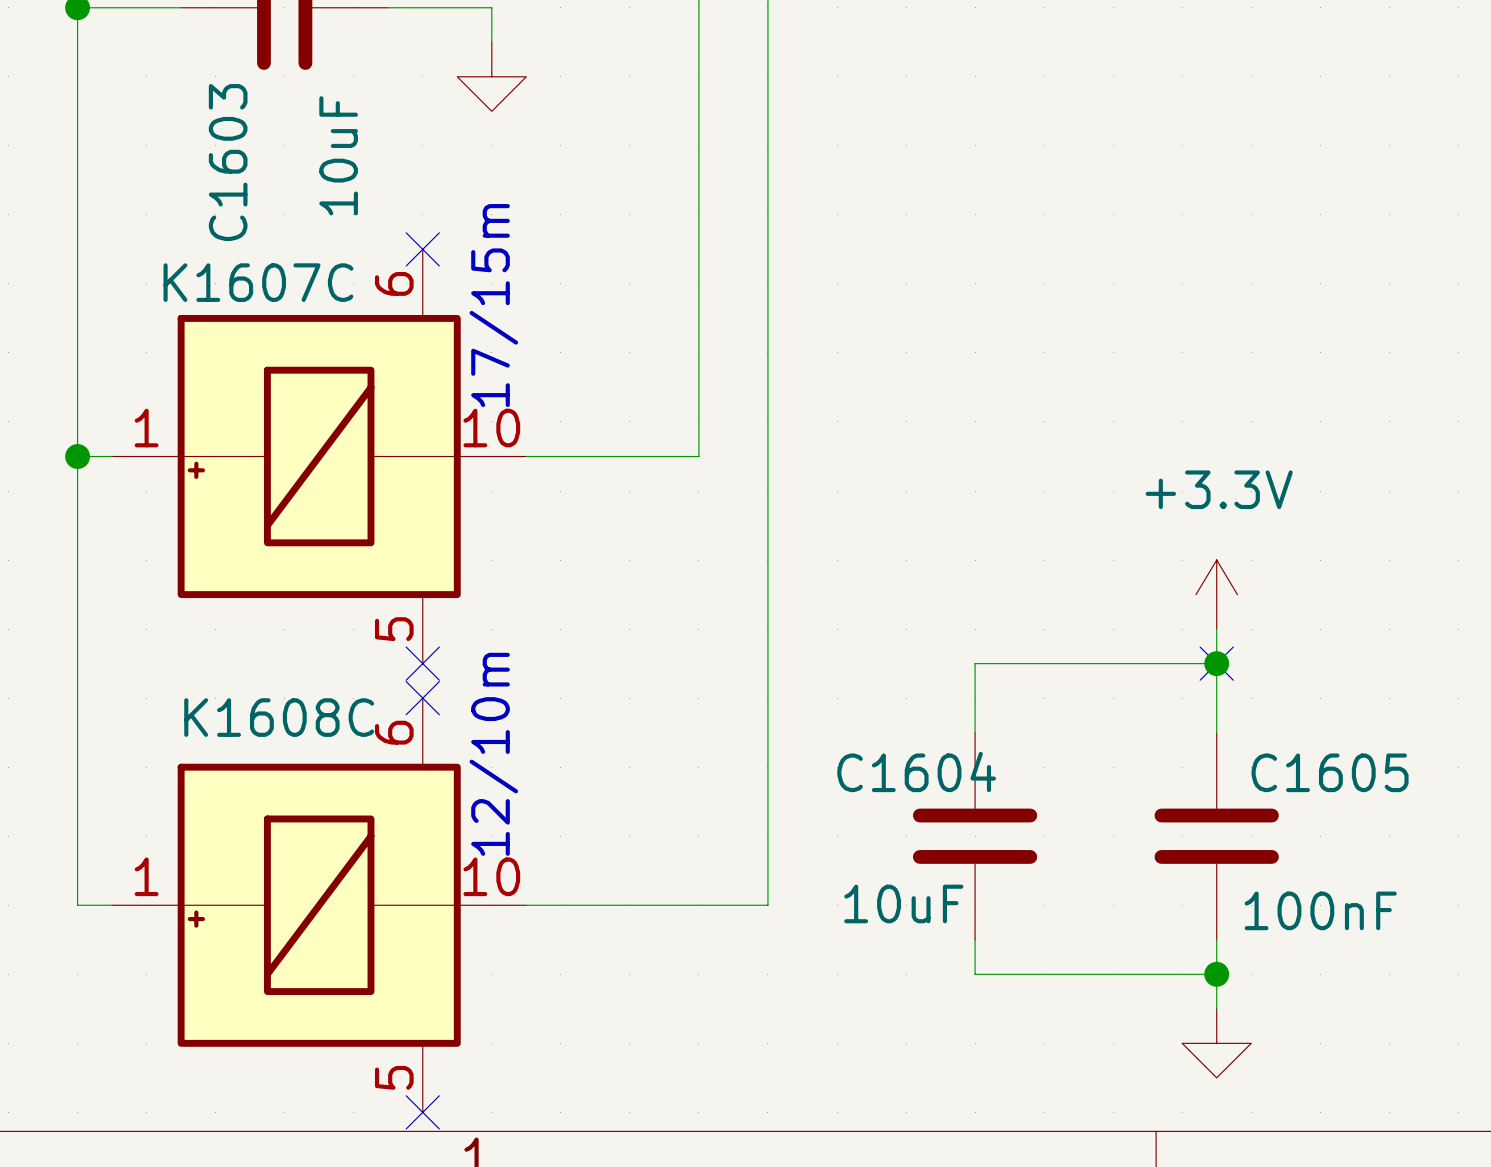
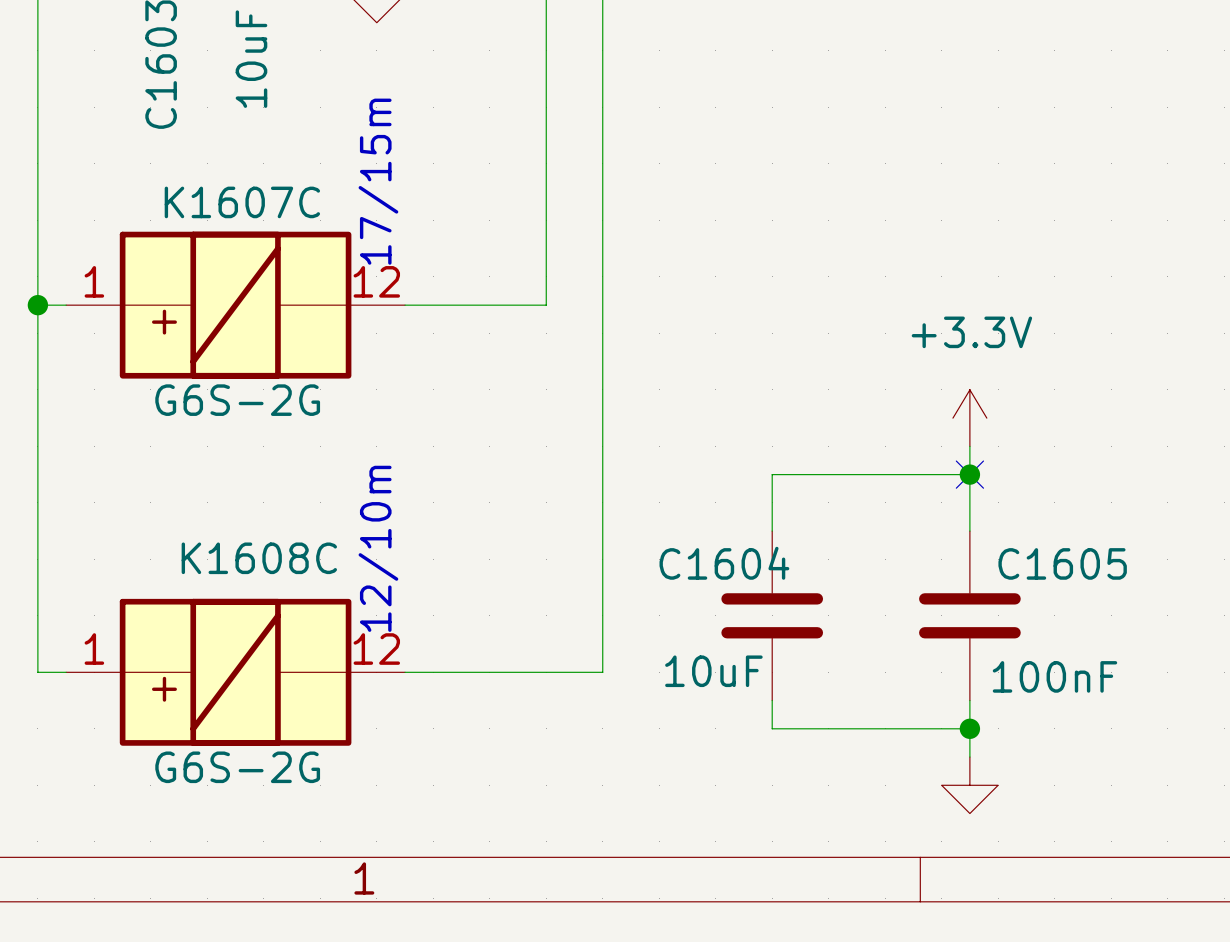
K1607C symbol: [112, 249, 527, 664] -> [66, 231, 406, 379]
no-connect mark: (422, 249) -> none
K1607C name position: K1607C (258, 282) -> K1607C (242, 202)
K1607C value: none -> G6S-2G (237, 400)
no-connect mark: (422, 663) -> none
K1608C symbol: [112, 698, 527, 1113] -> [66, 598, 406, 746]
no-connect mark: (422, 698) -> none
K1608C name position: K1608C (279, 717) -> K1608C (259, 558)
K1608C value: none -> G6S-2G (237, 767)
no-connect mark: (422, 1112) -> none

